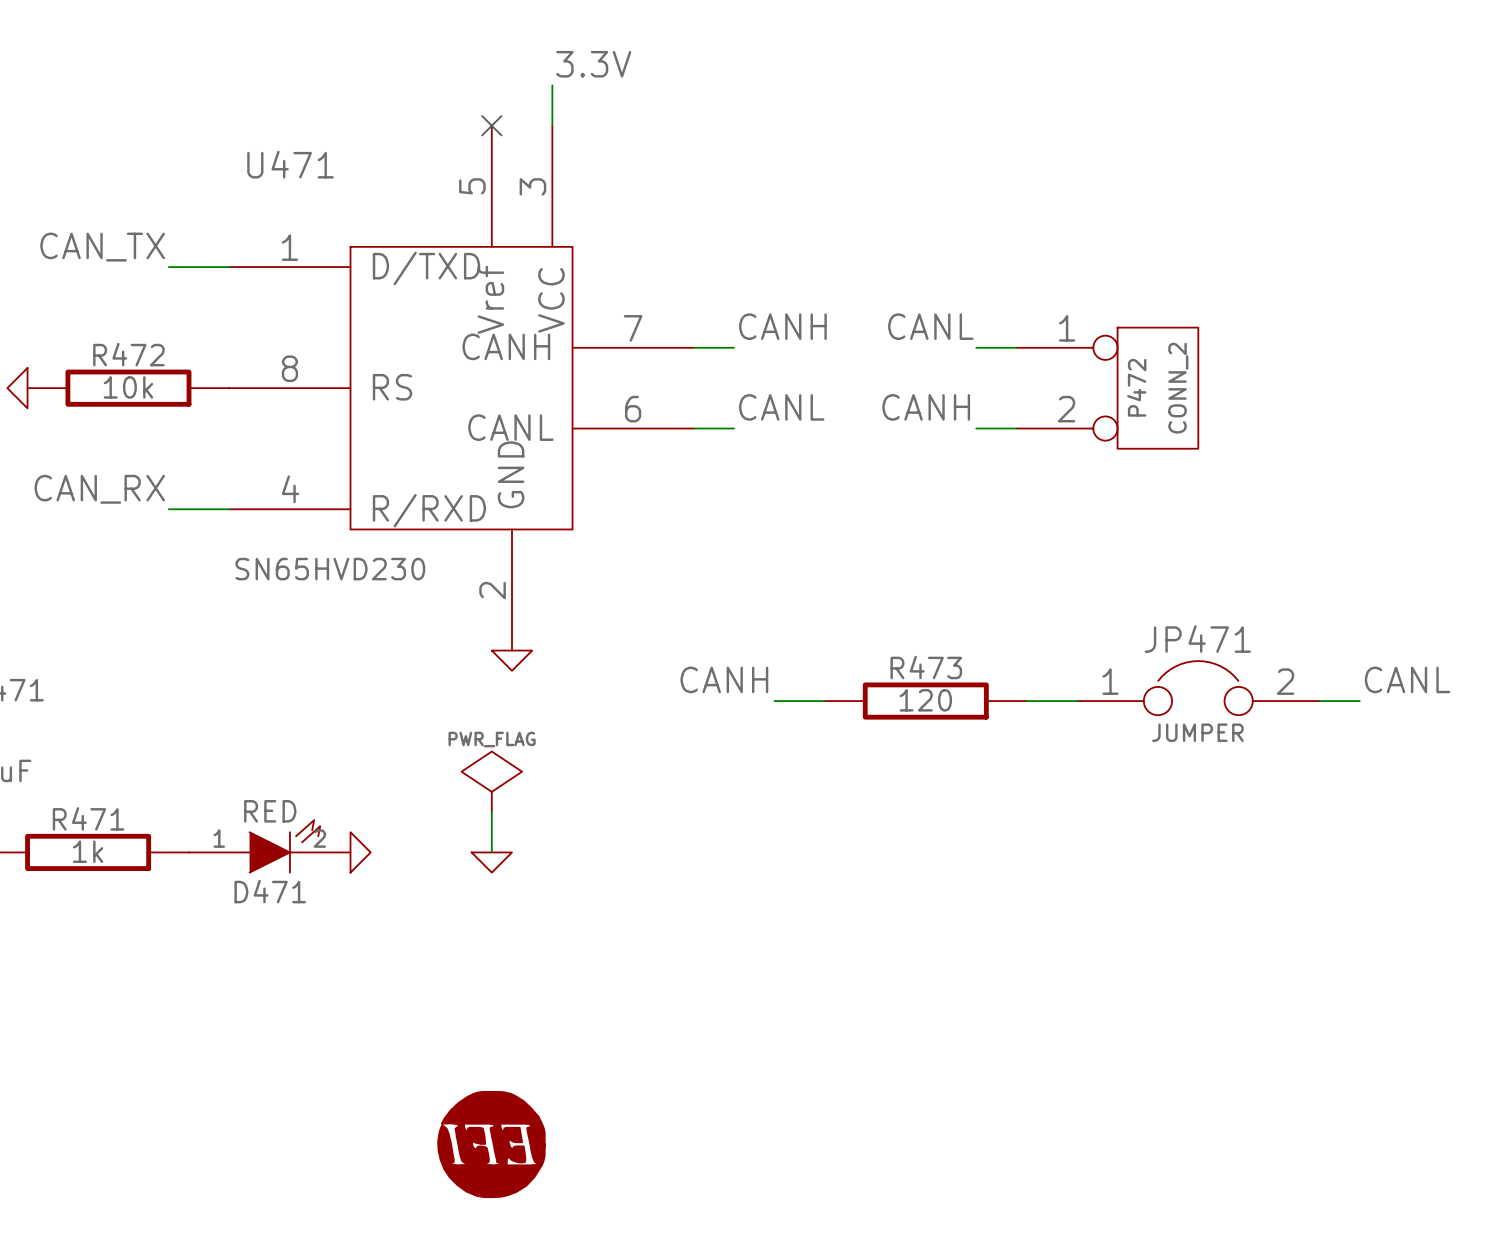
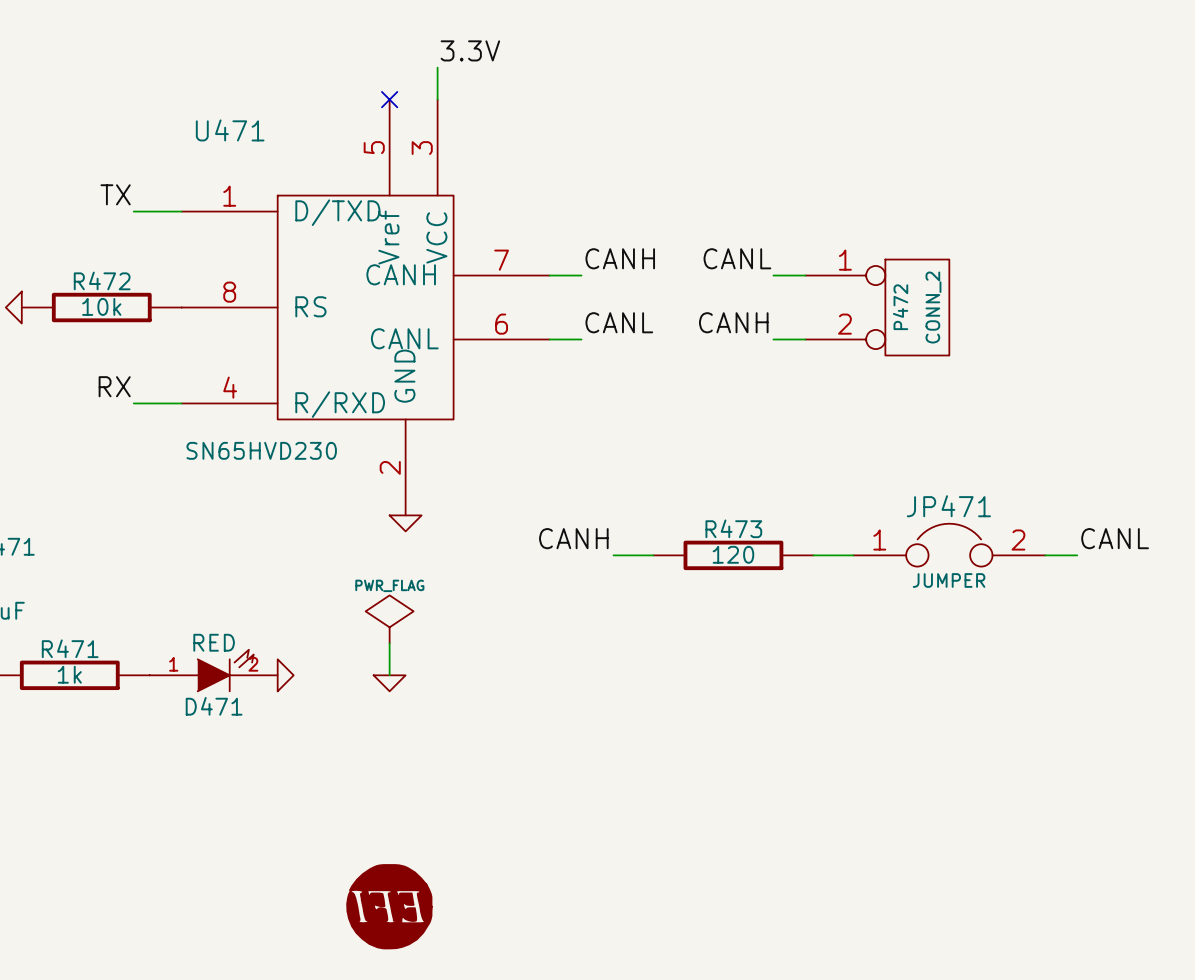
label: CAN_TX (102, 247) -> TX (115, 194)
label: CAN_RX (99, 489) -> RX (114, 386)

